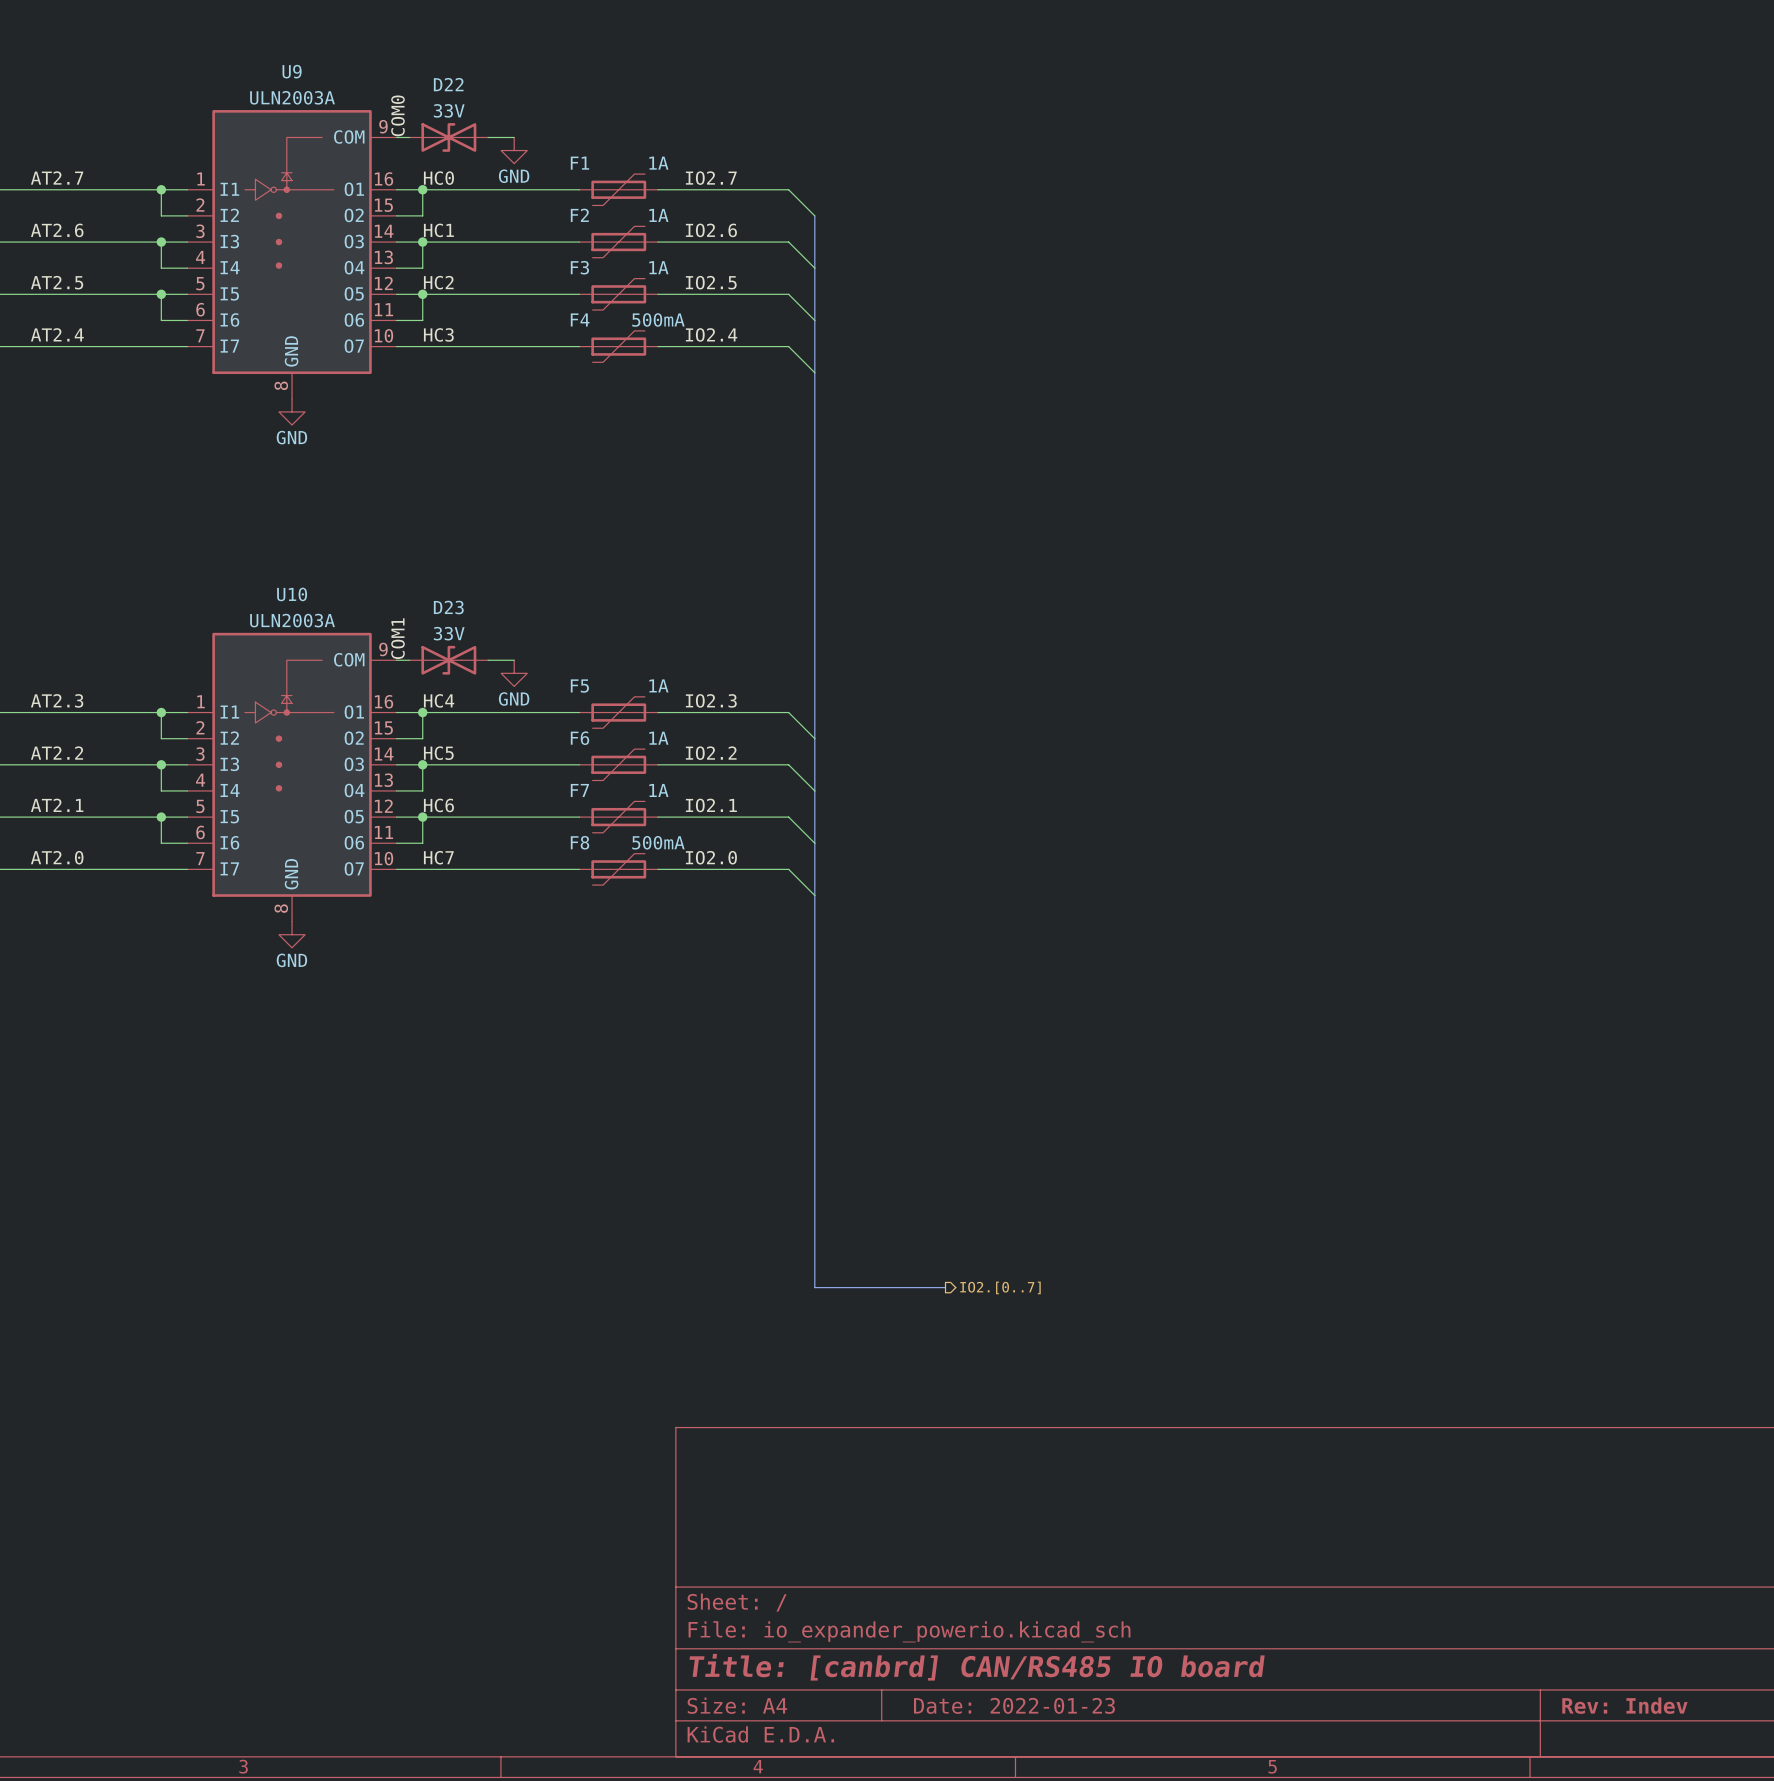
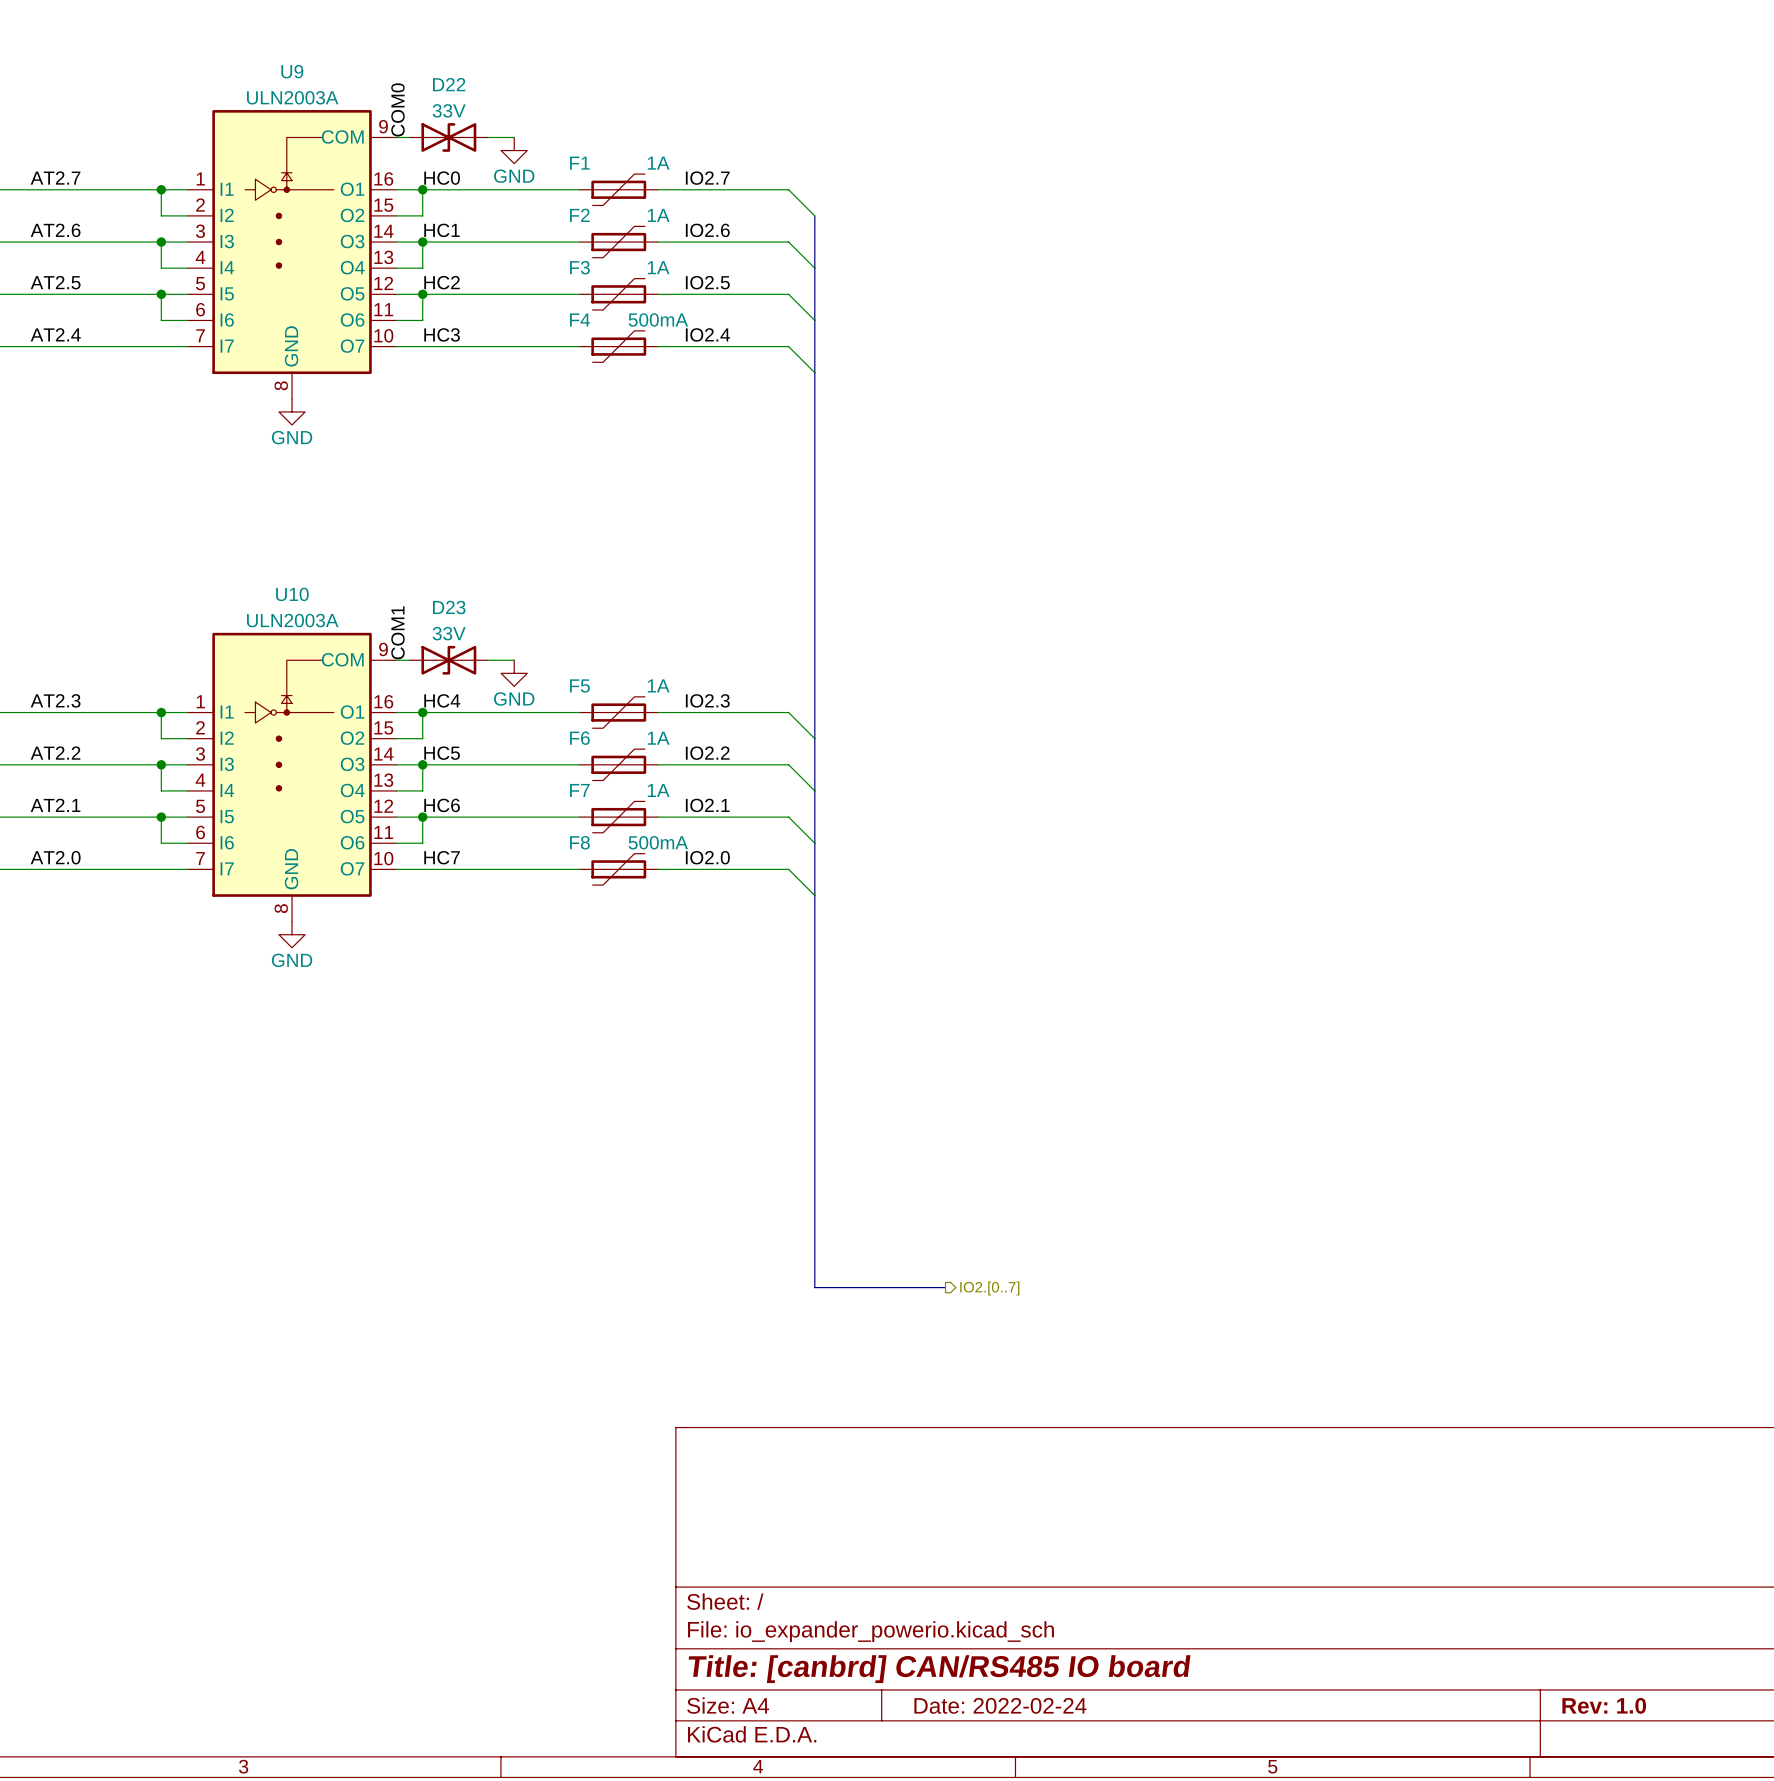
title block: Date: 2022-01-23 (1014, 1705) -> Date: 2022-02-24 (1000, 1705)
title block: Rev: Indev (1624, 1705) -> Rev: 1.0 (1604, 1705)

